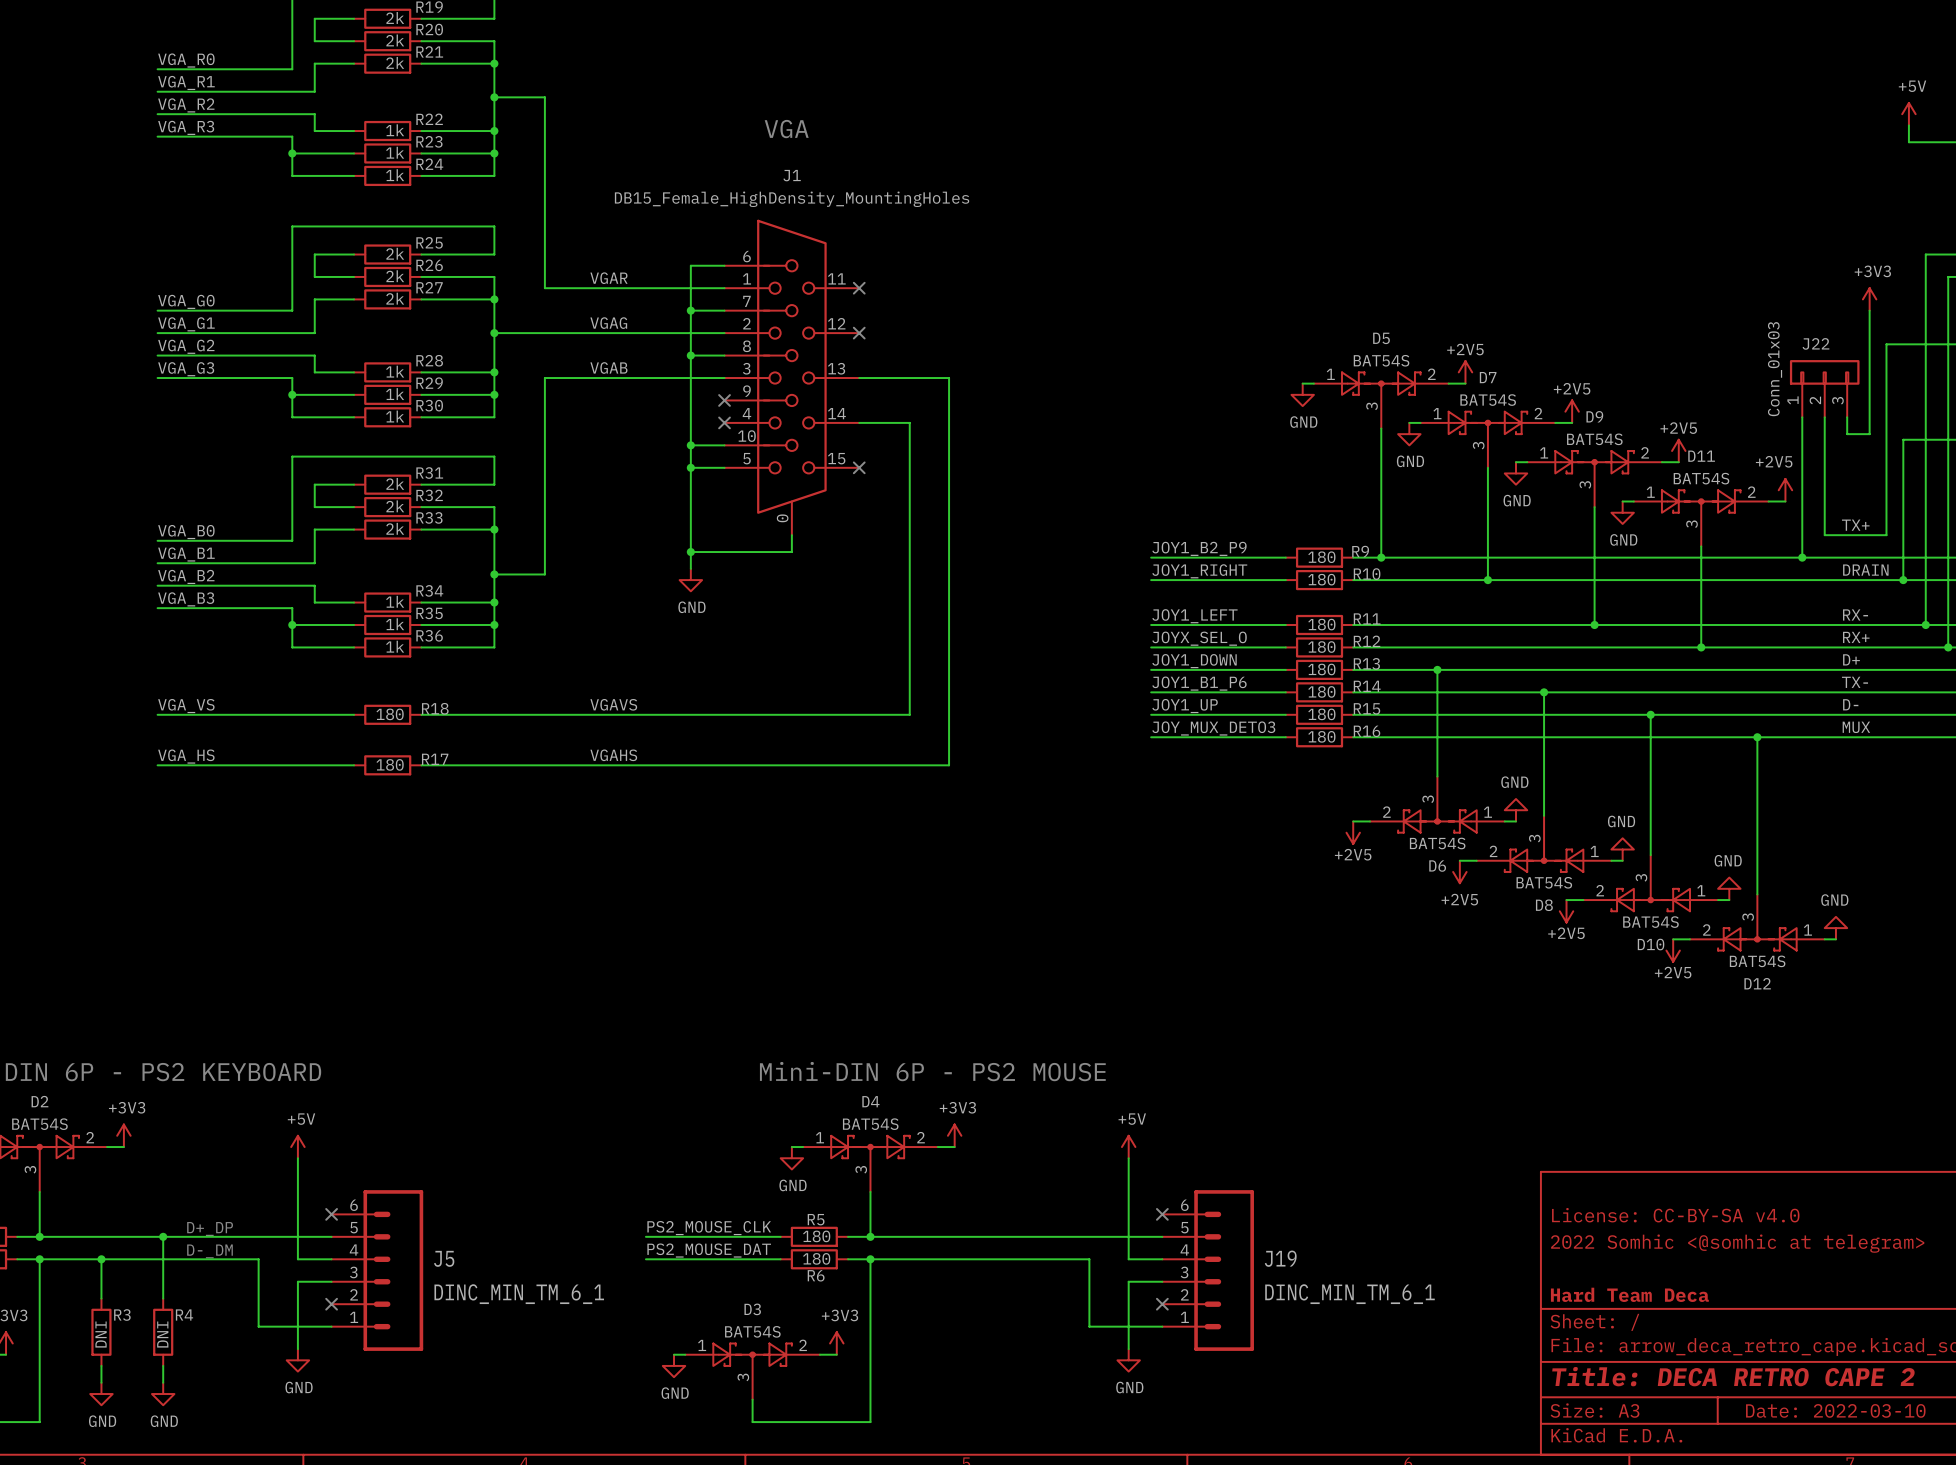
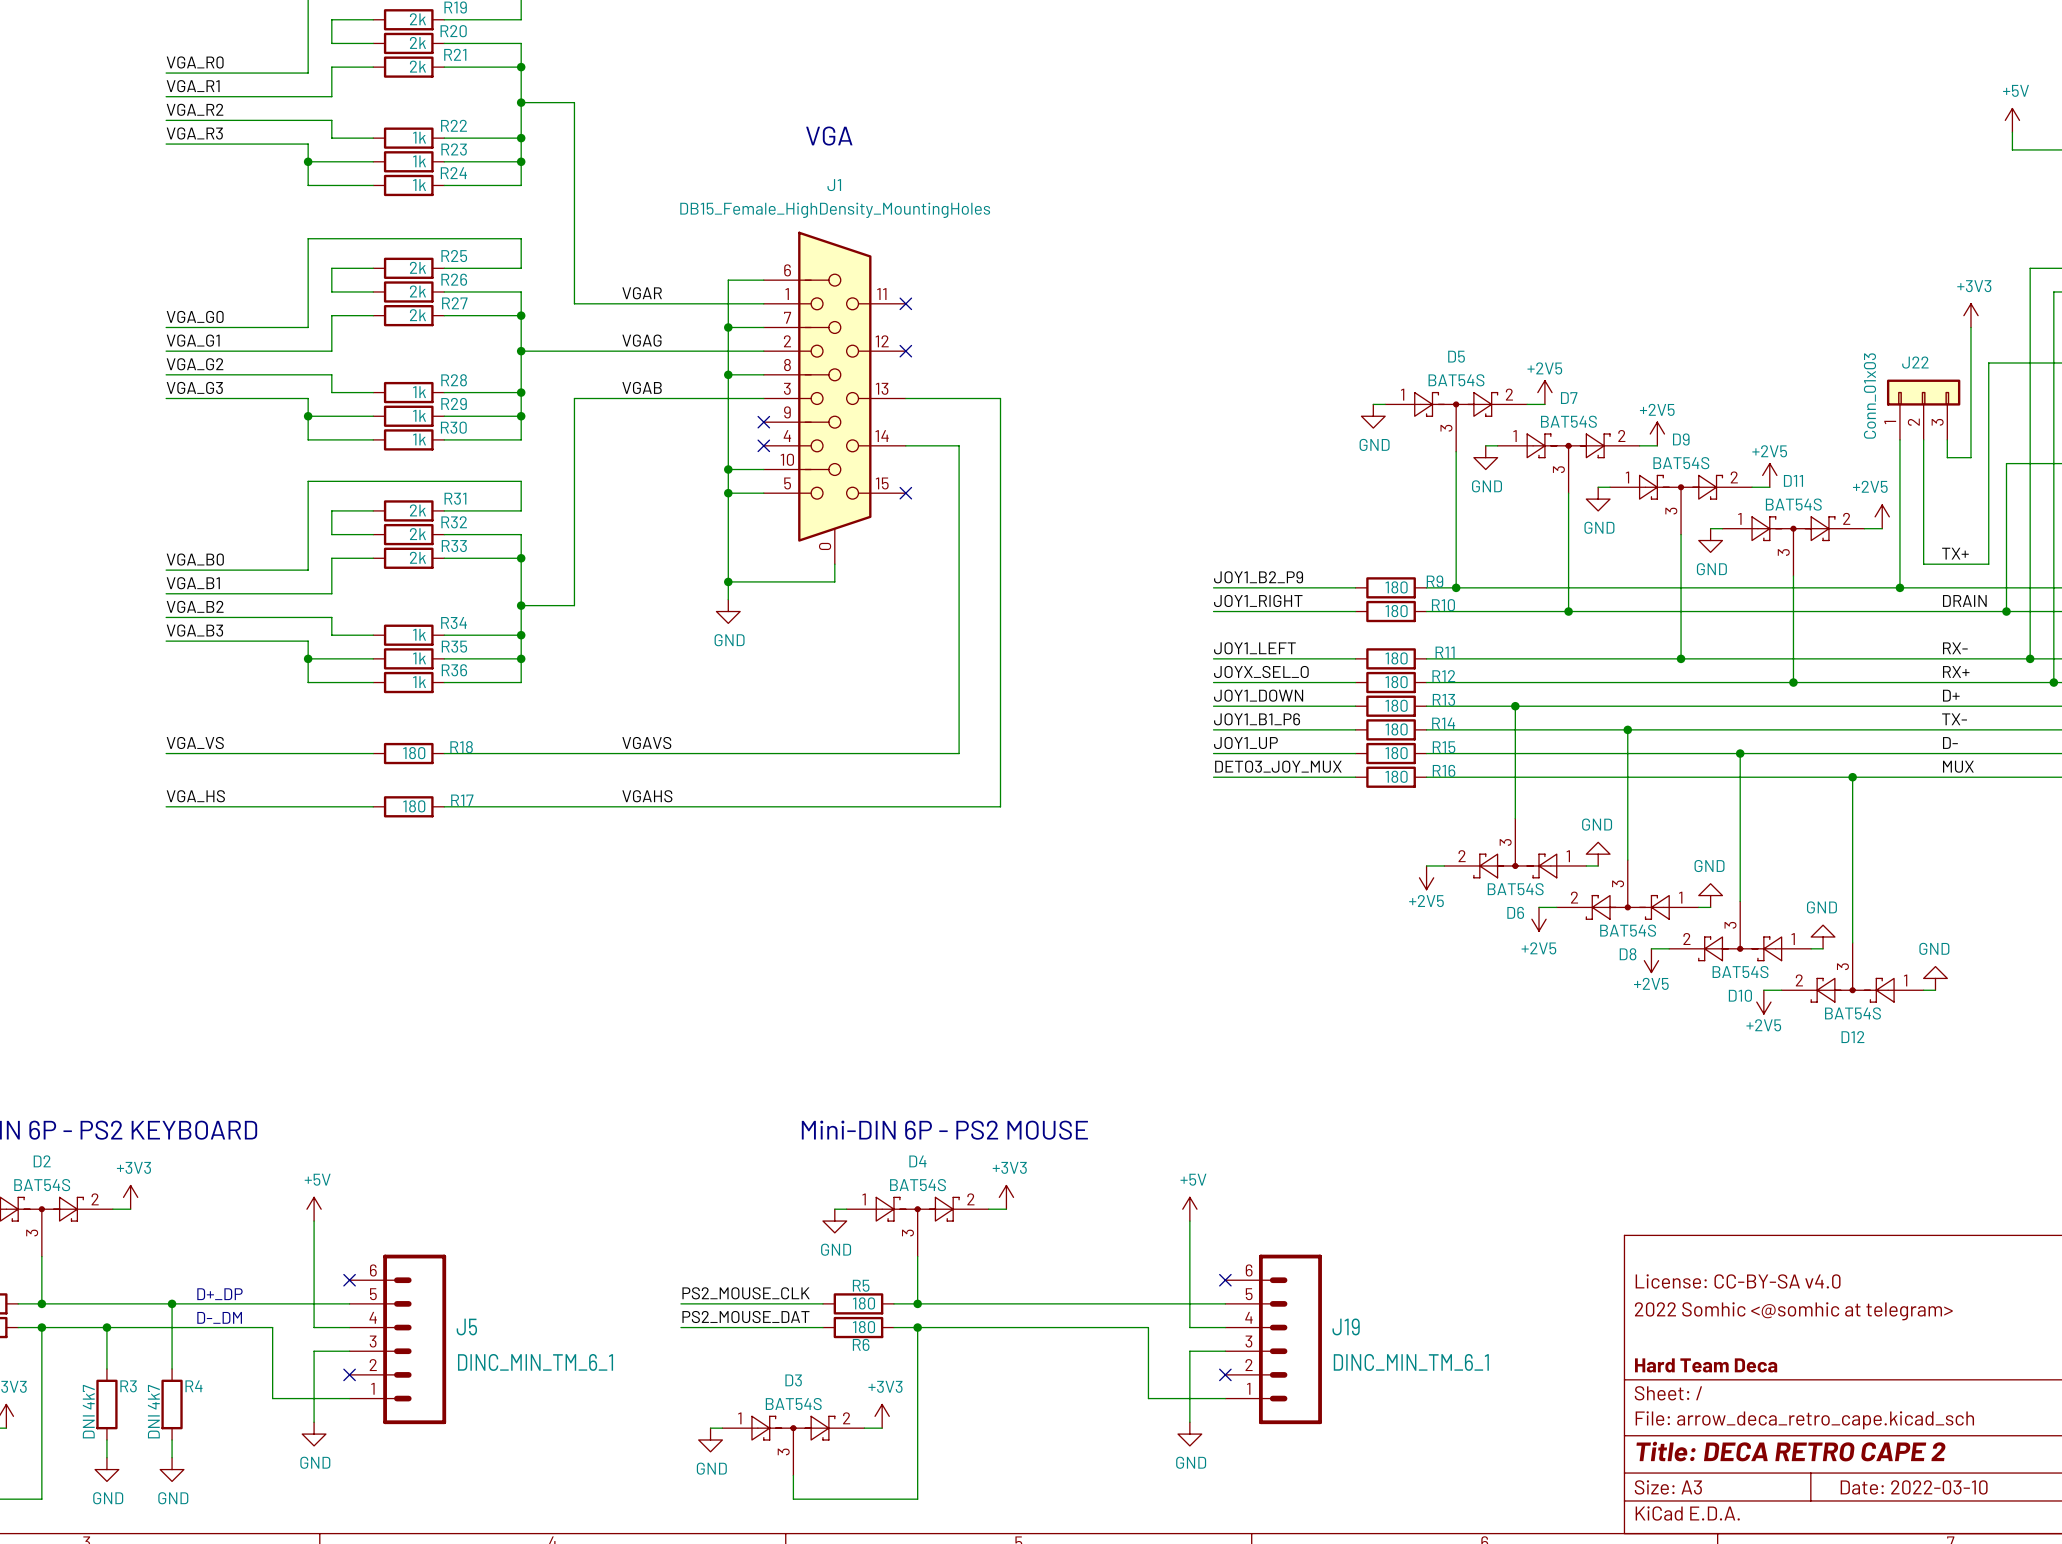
label: JOY_MUX_DETO3 (1213, 728) -> DETO3_JOY_MUX (1278, 766)
R3 value: DNI (101, 1334) -> DNI 4k7 (88, 1411)
R4 value: DNI (162, 1334) -> DNI 4k7 (153, 1411)

